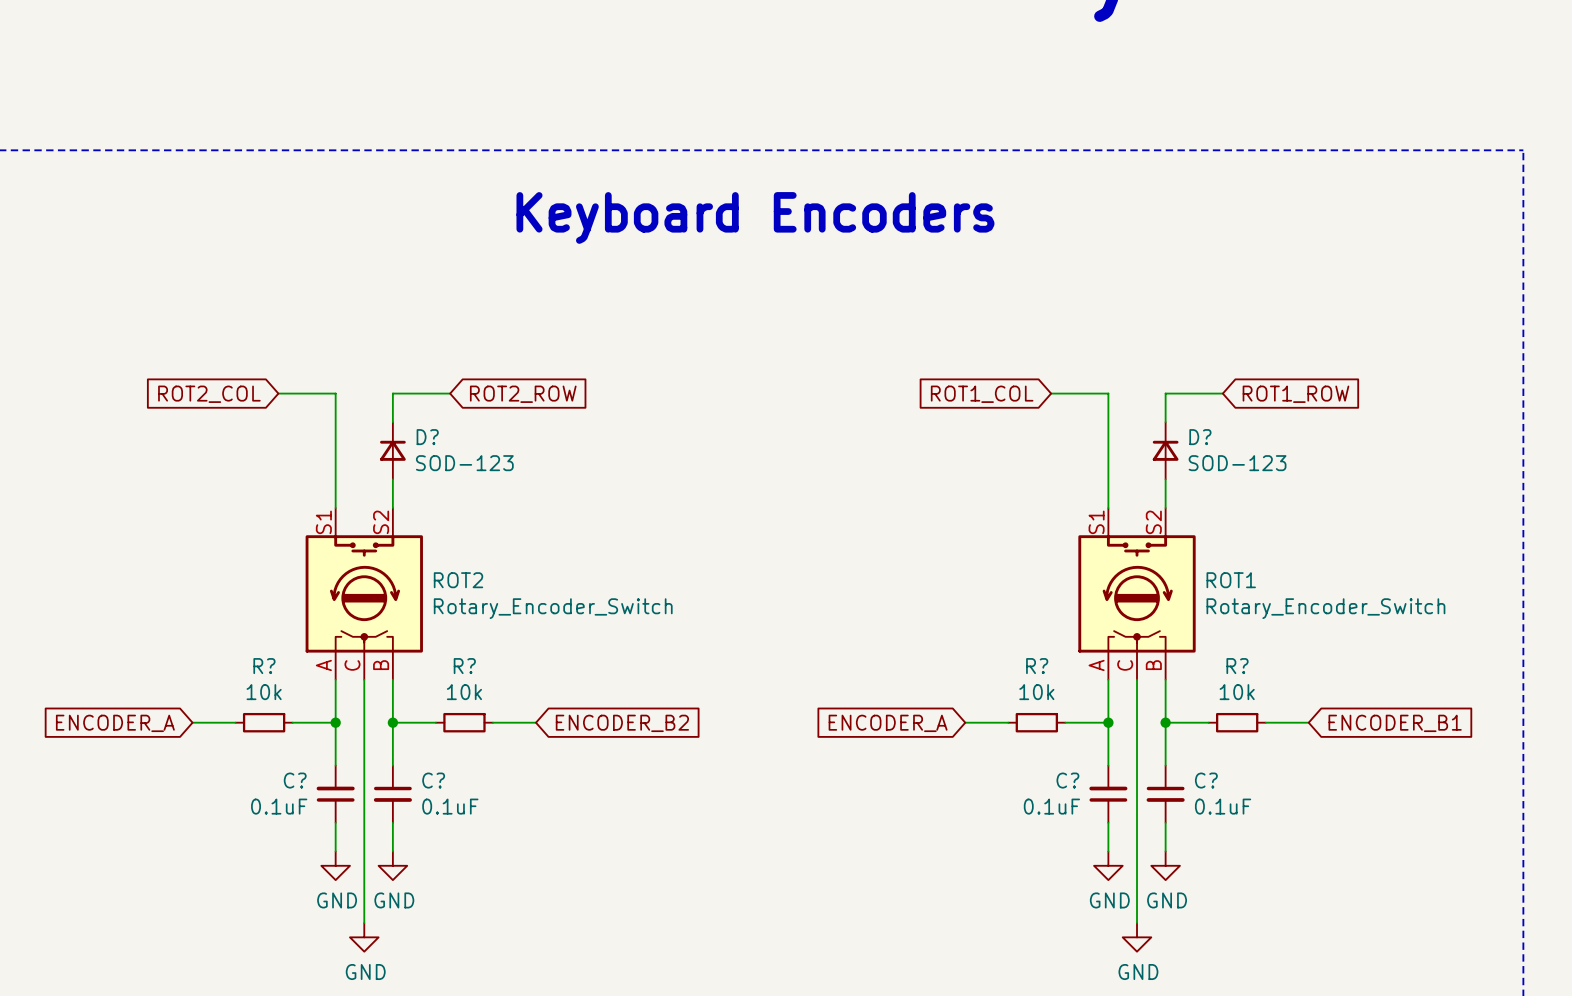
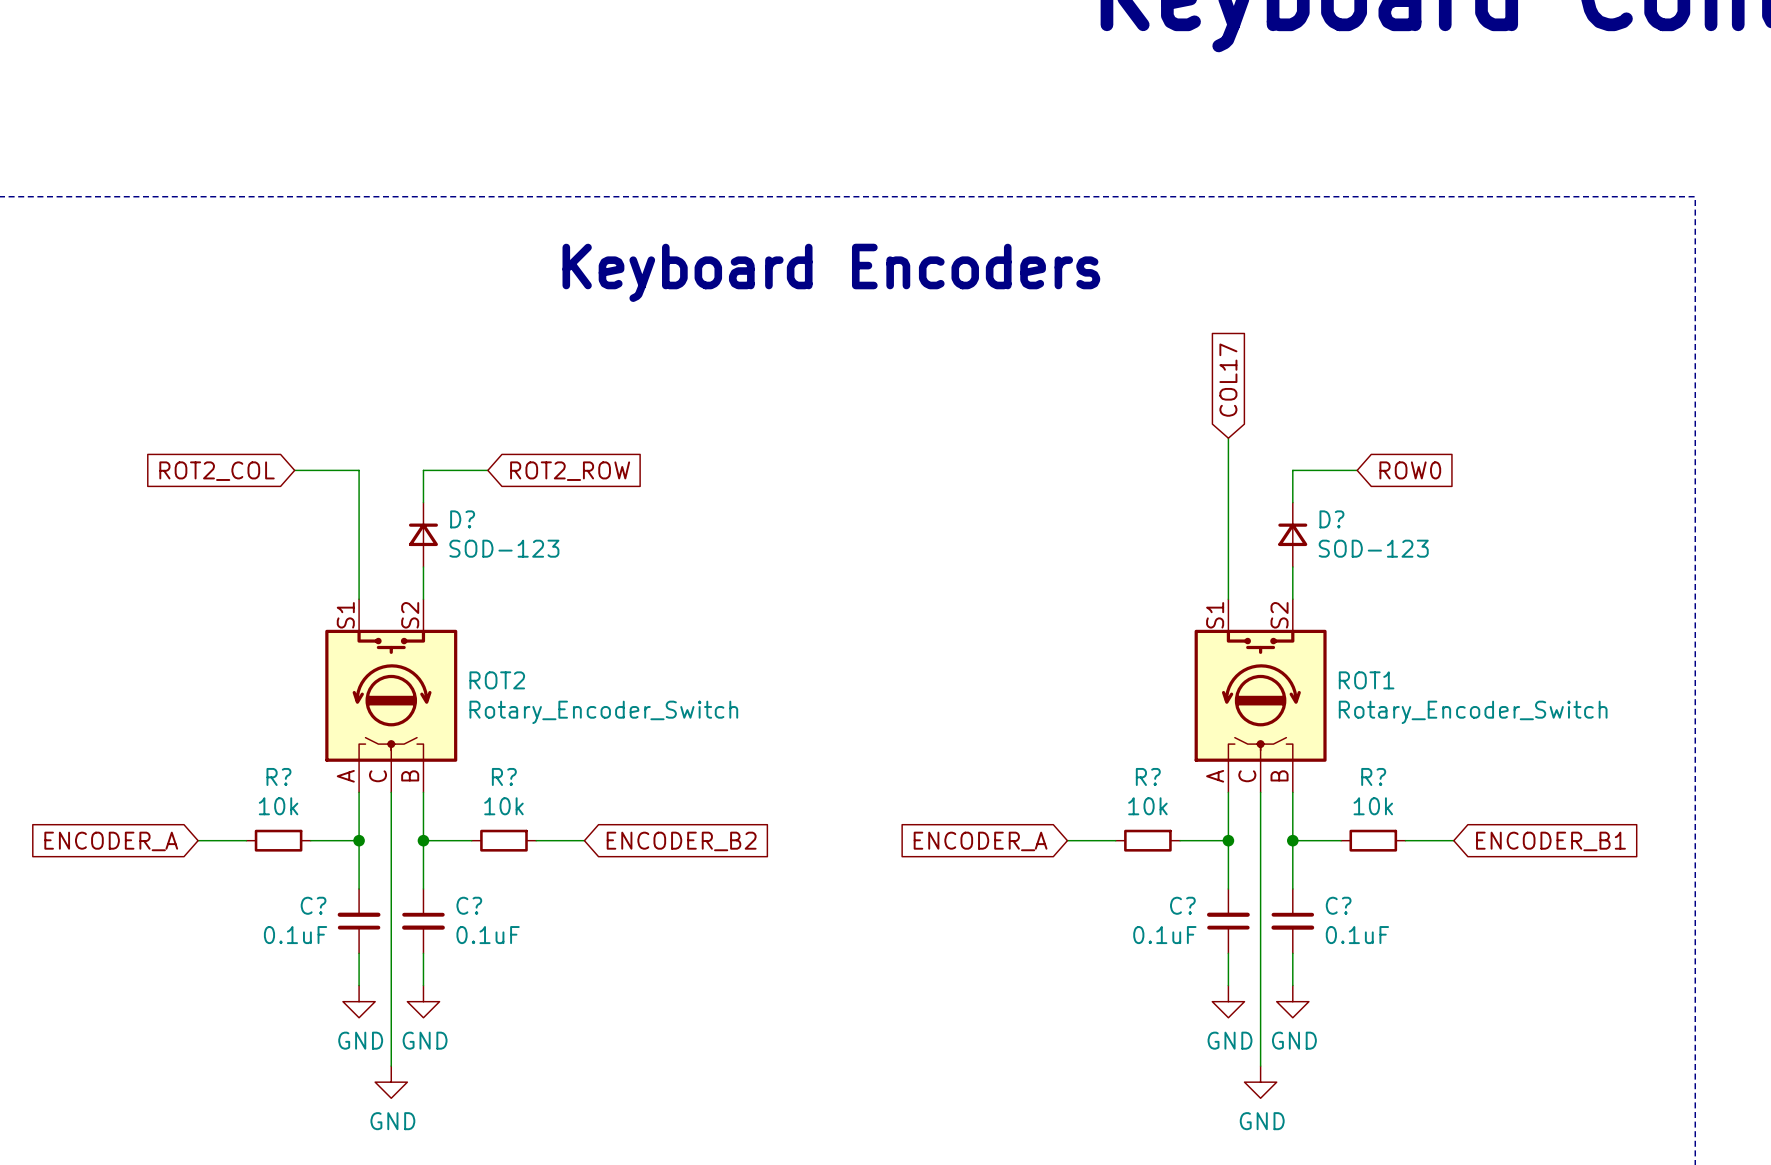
global label: none -> COL17 (1228, 380)
wire: (1051, 393) (1108, 393) -> (1228, 438) (1228, 470)
global label: ROT1_COL (982, 394) -> none
global label: ROT1_ROW (1295, 394) -> ROW0 (1410, 470)

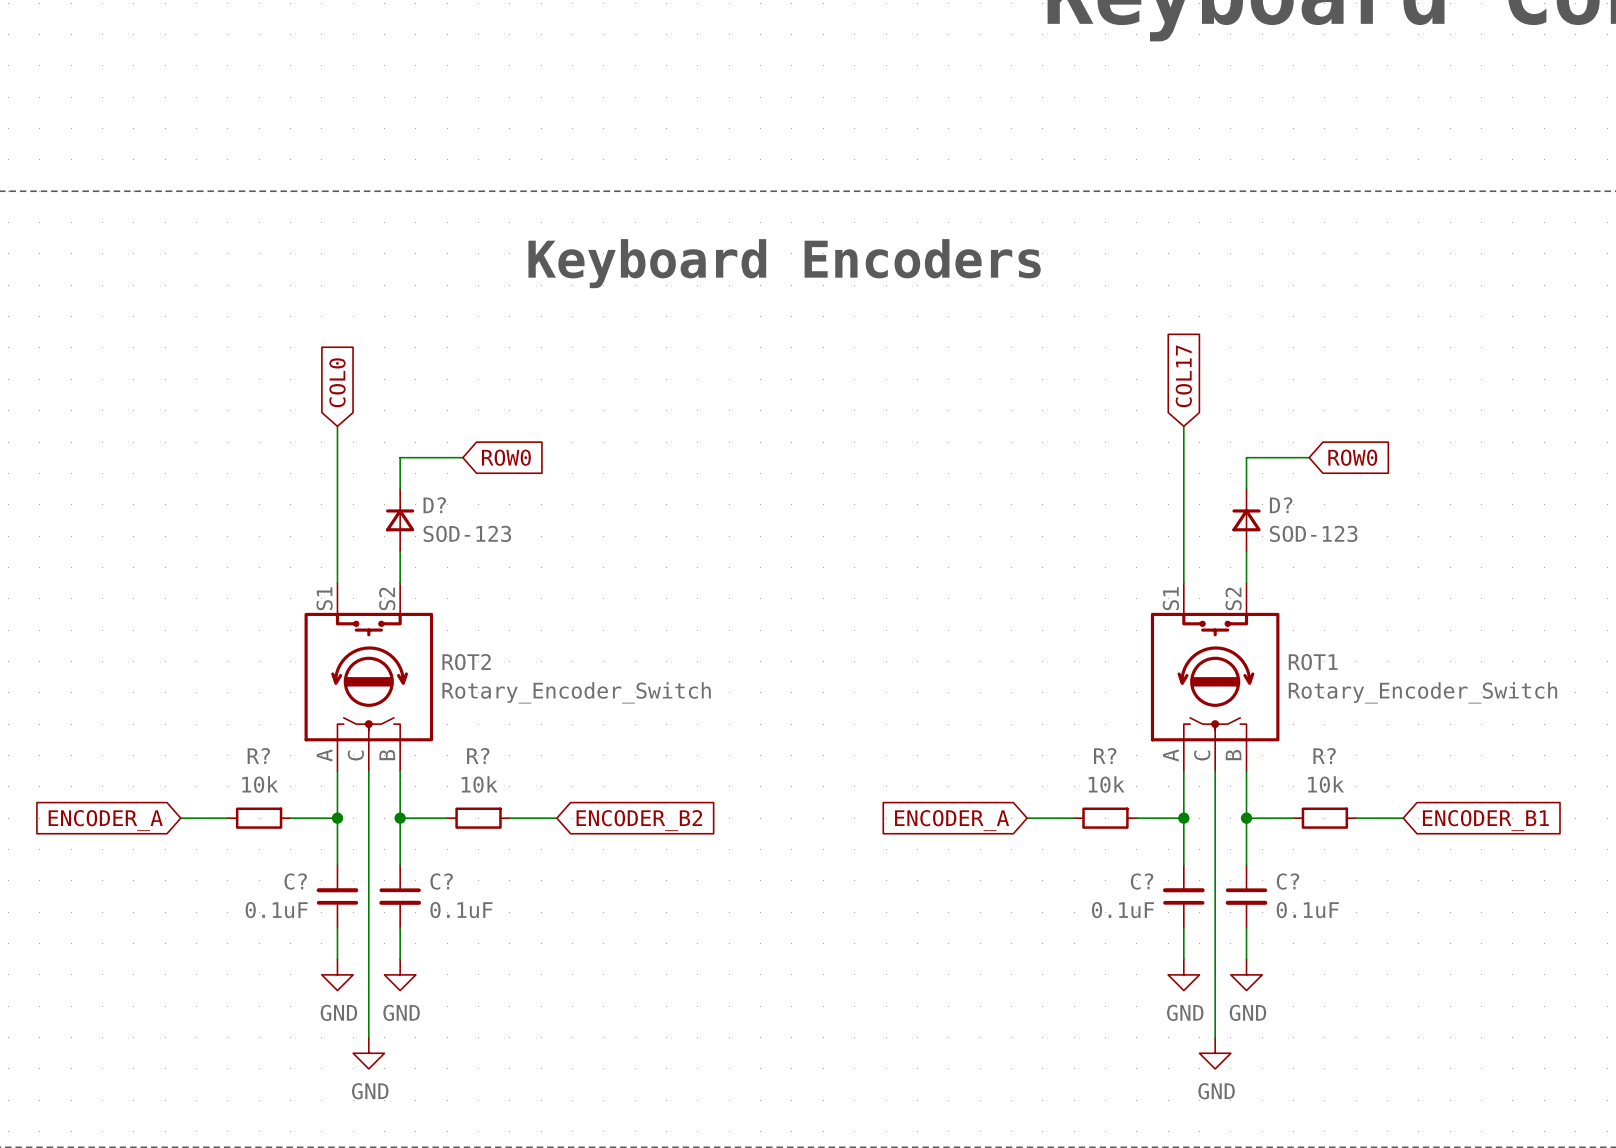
global label: none -> COL0 (337, 382)
wire: (294, 470) (359, 470) -> (337, 426) (337, 457)
global label: ROT2_COL (217, 471) -> none
global label: ROT2_ROW (570, 471) -> ROW0 (506, 457)

